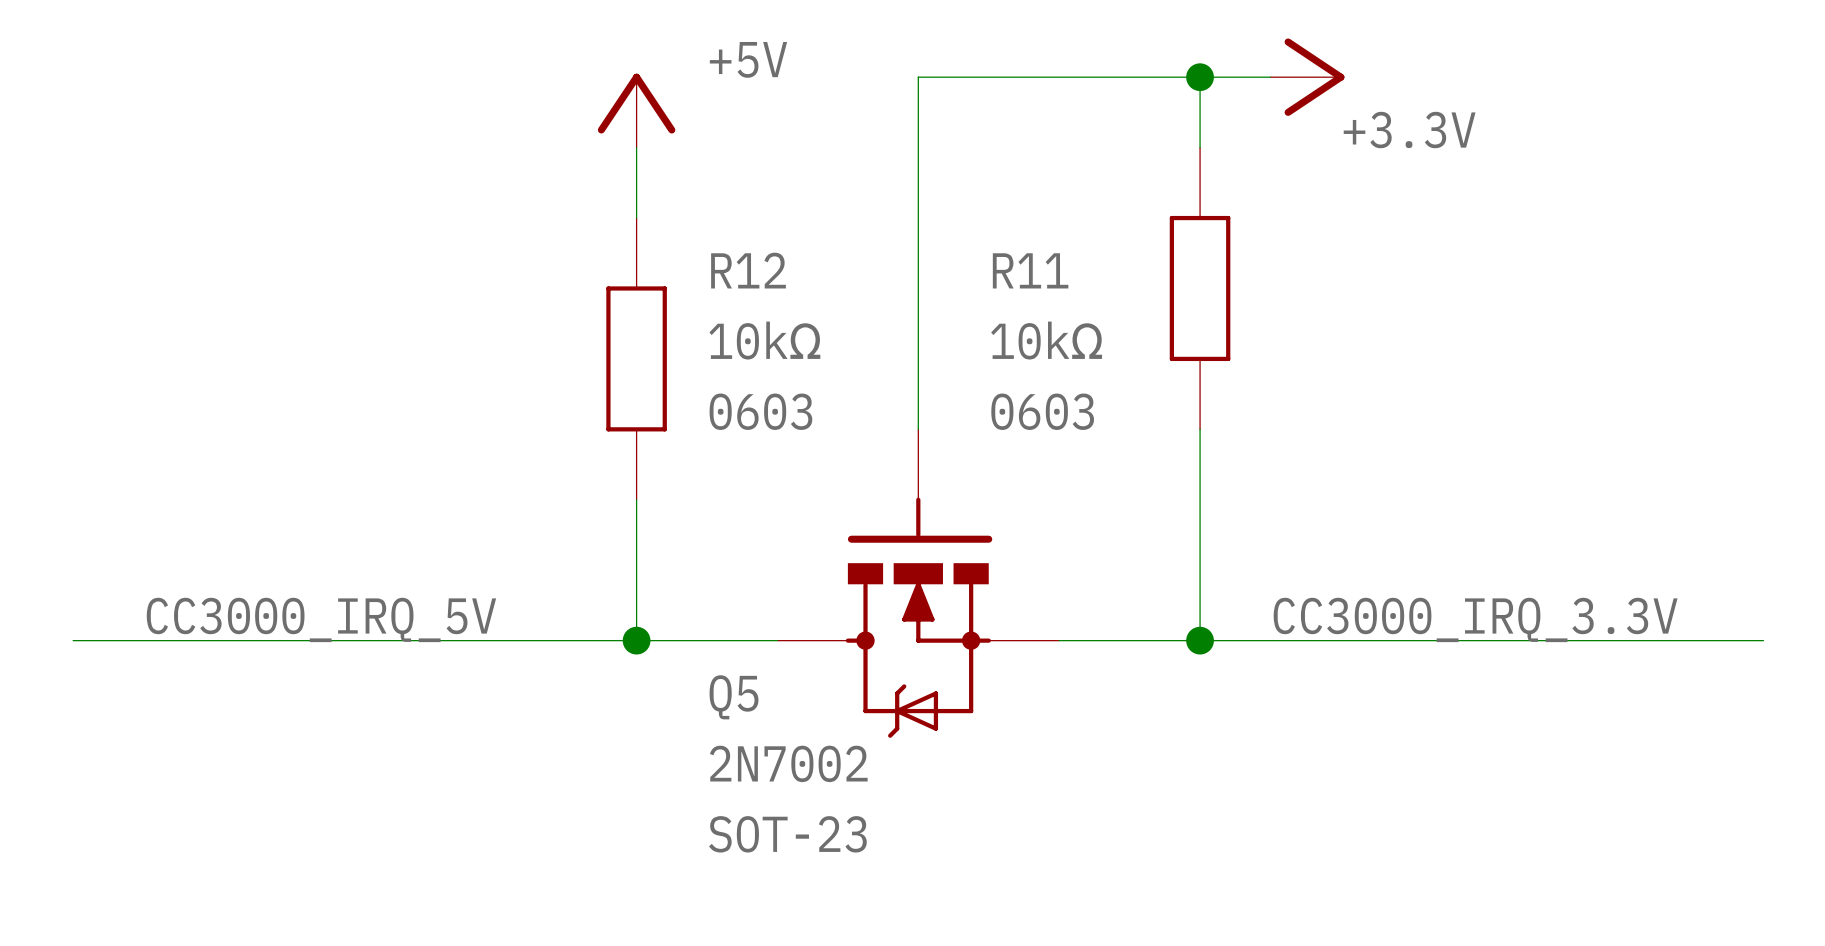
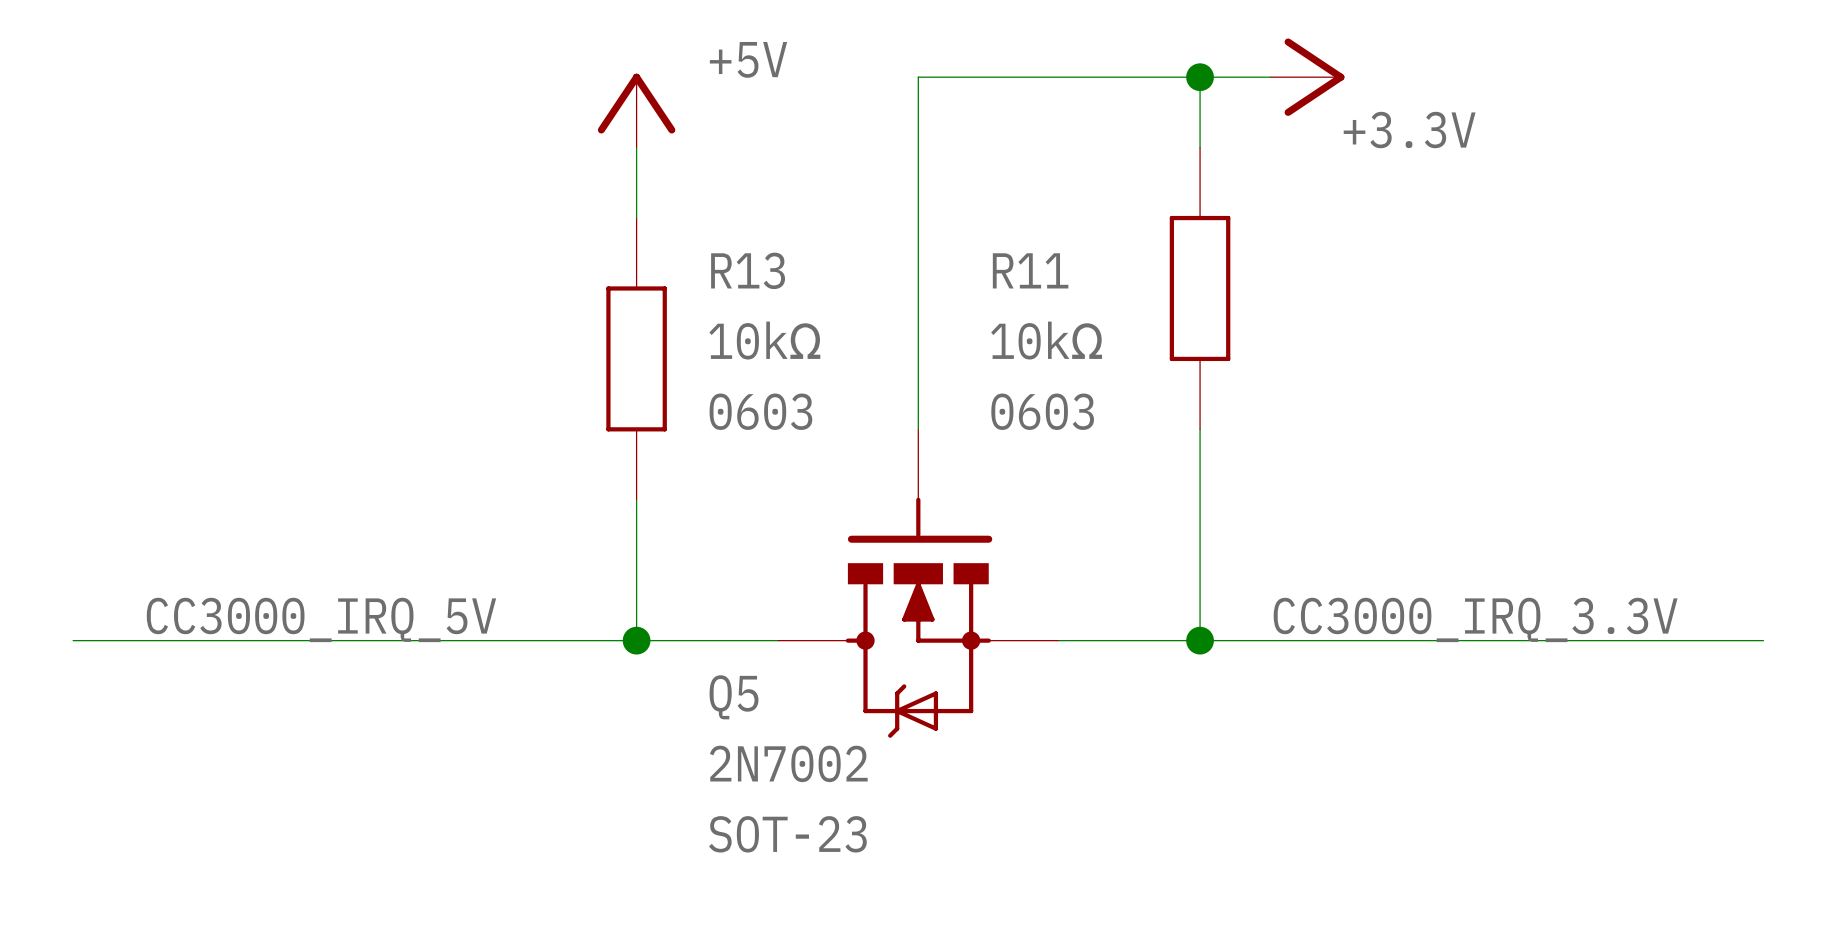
R12 name: R12 (748, 270) -> R13 (748, 270)

